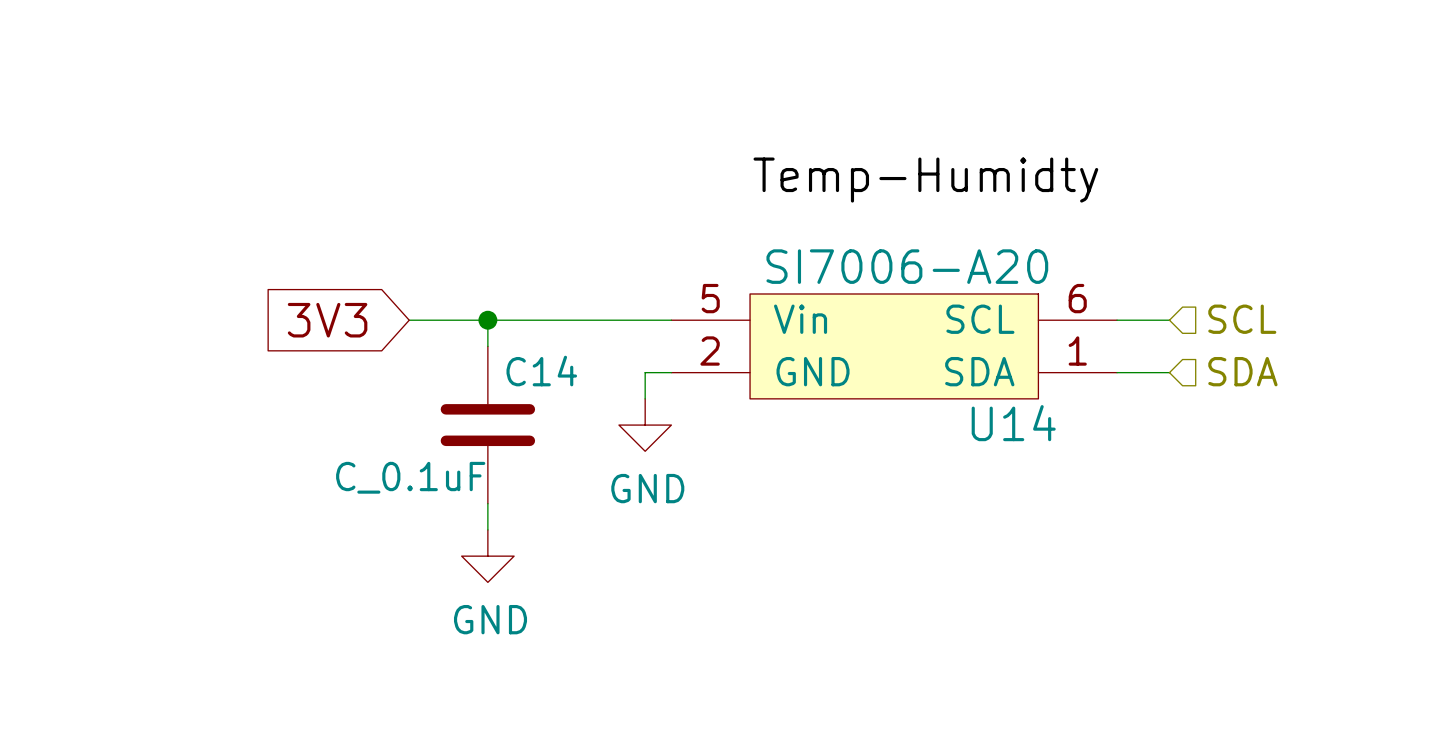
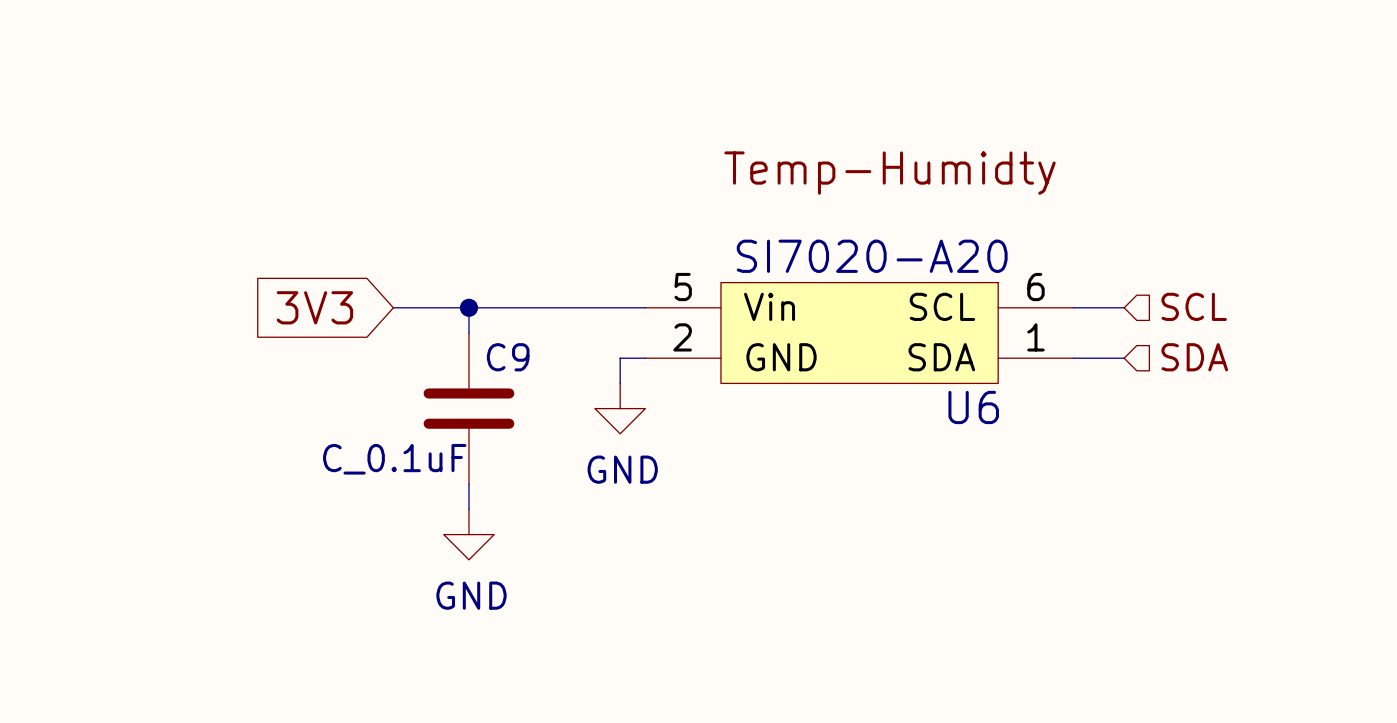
U14 value: SI7006-A20 (907, 266) -> SI7020-A20 (872, 256)
C14 name: C14 (541, 371) -> C9 (508, 357)
U14 name: U14 (1013, 423) -> U6 (973, 407)

